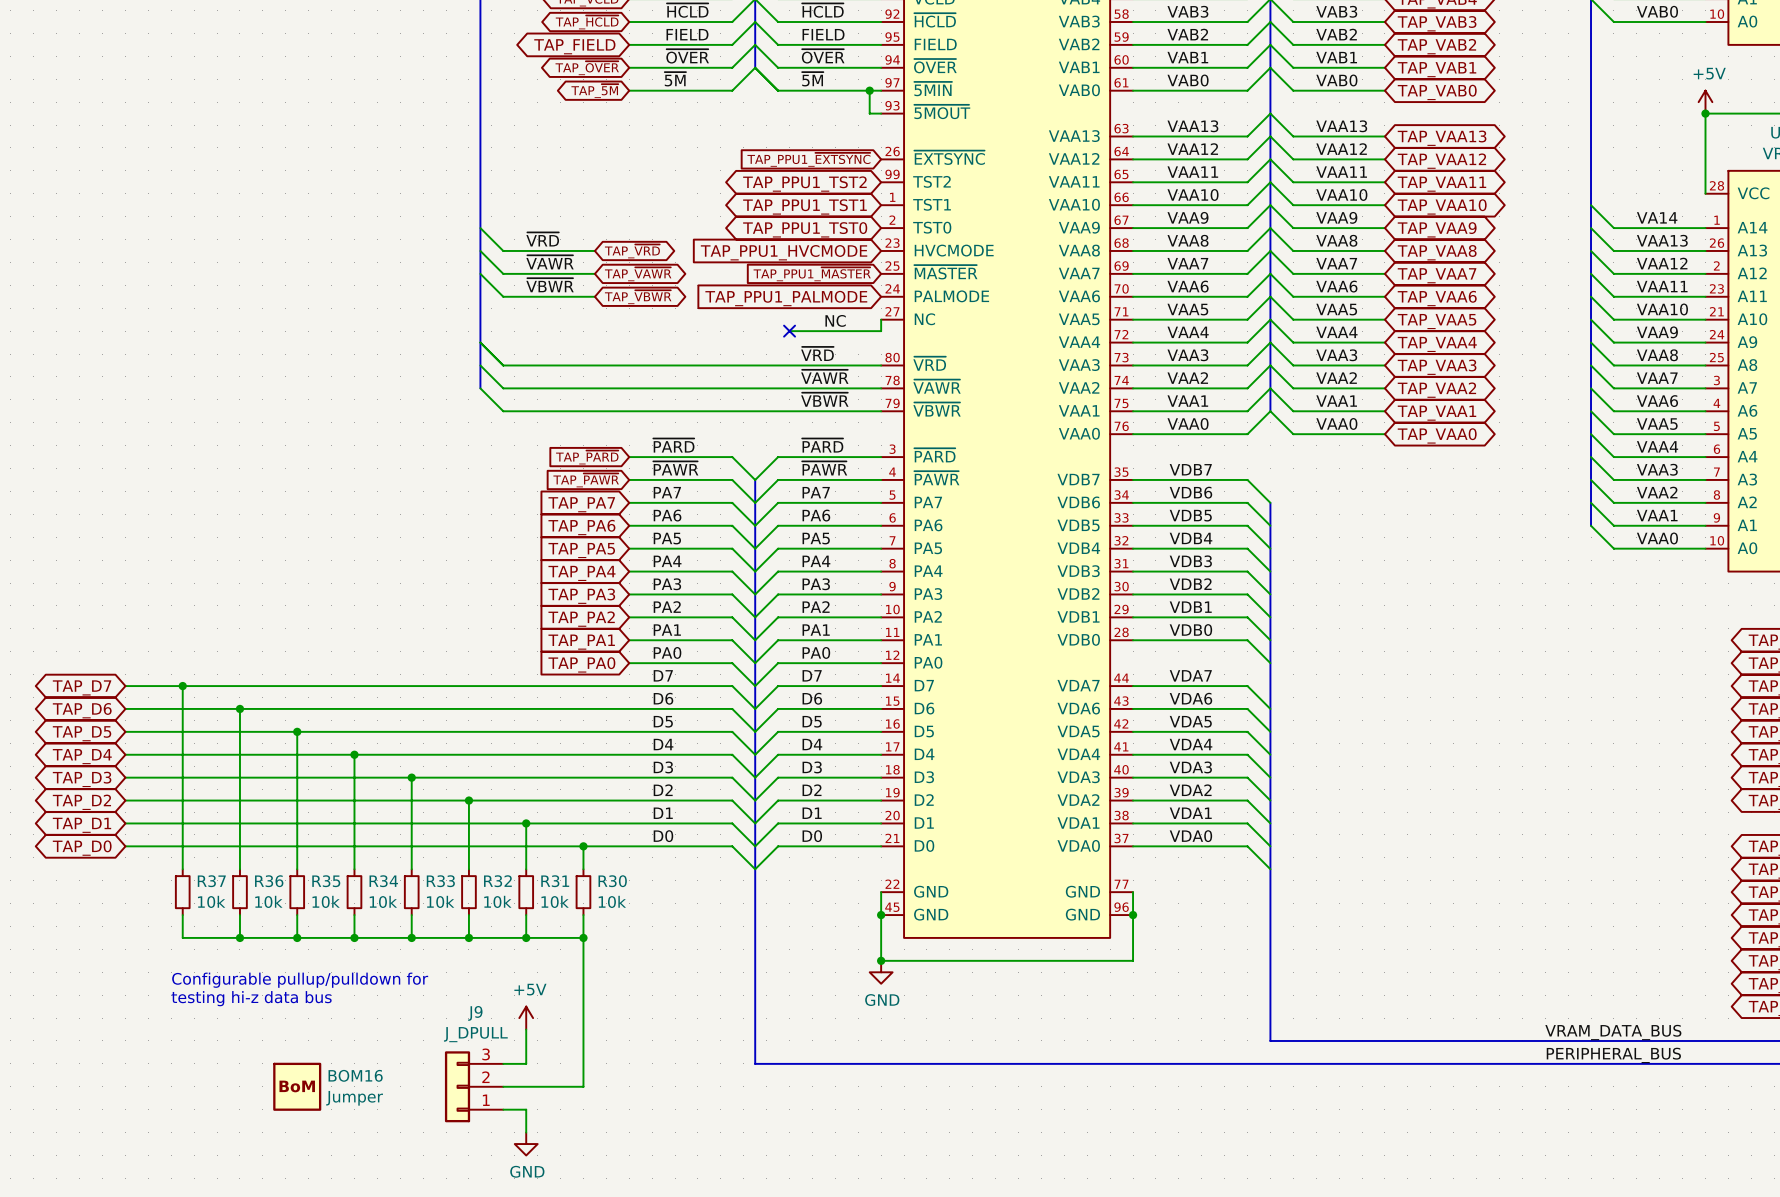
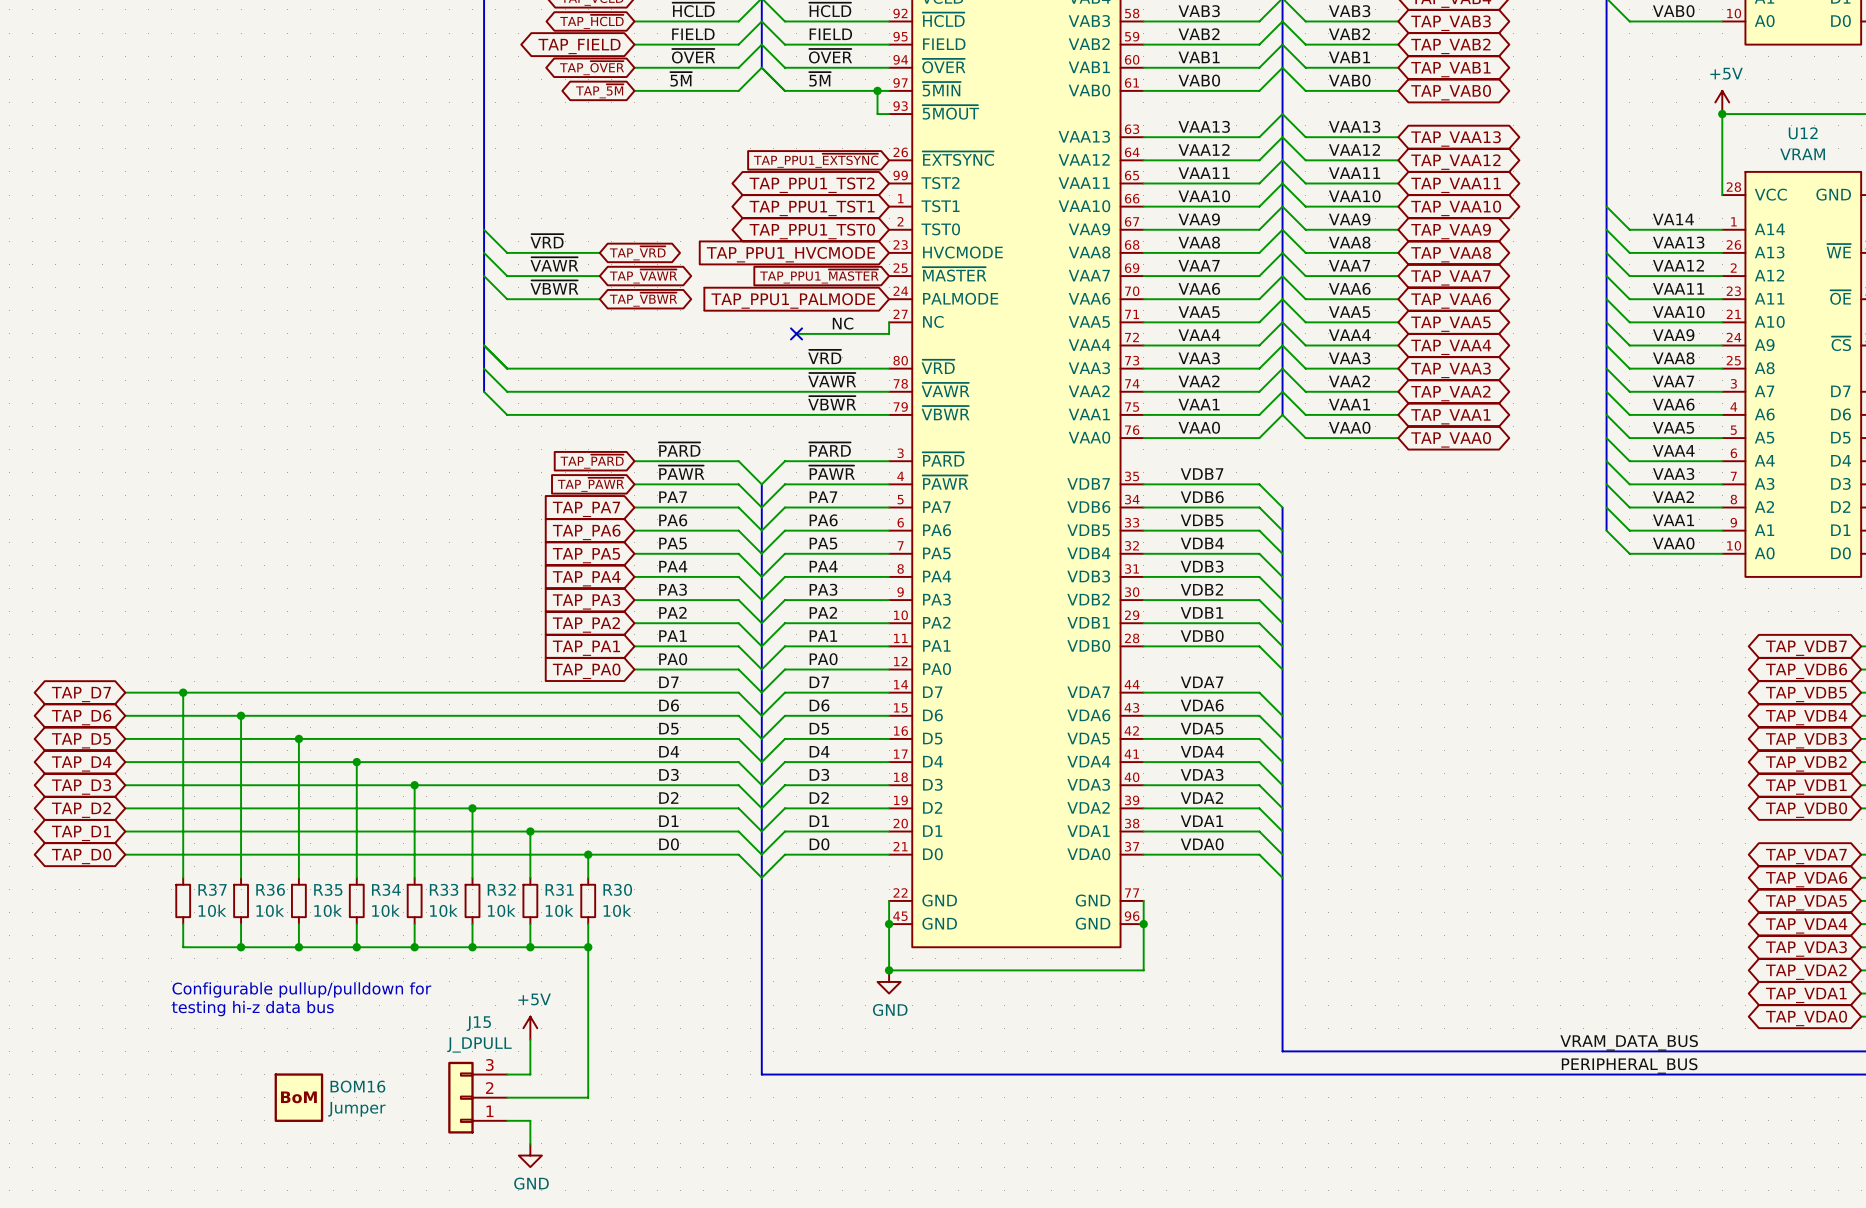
J9 name: J9 (475, 1013) -> J15 (478, 1023)

